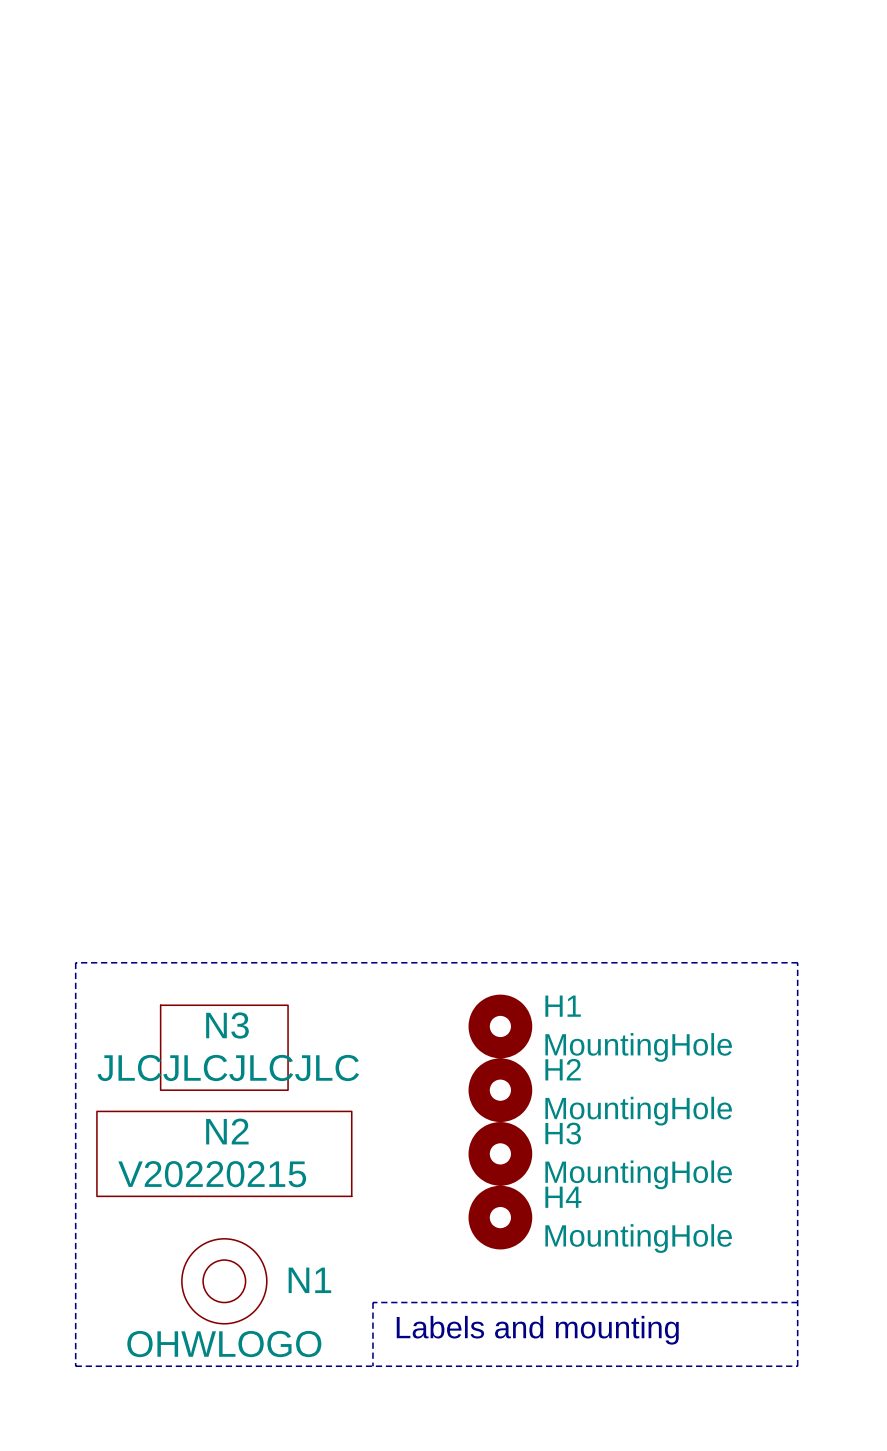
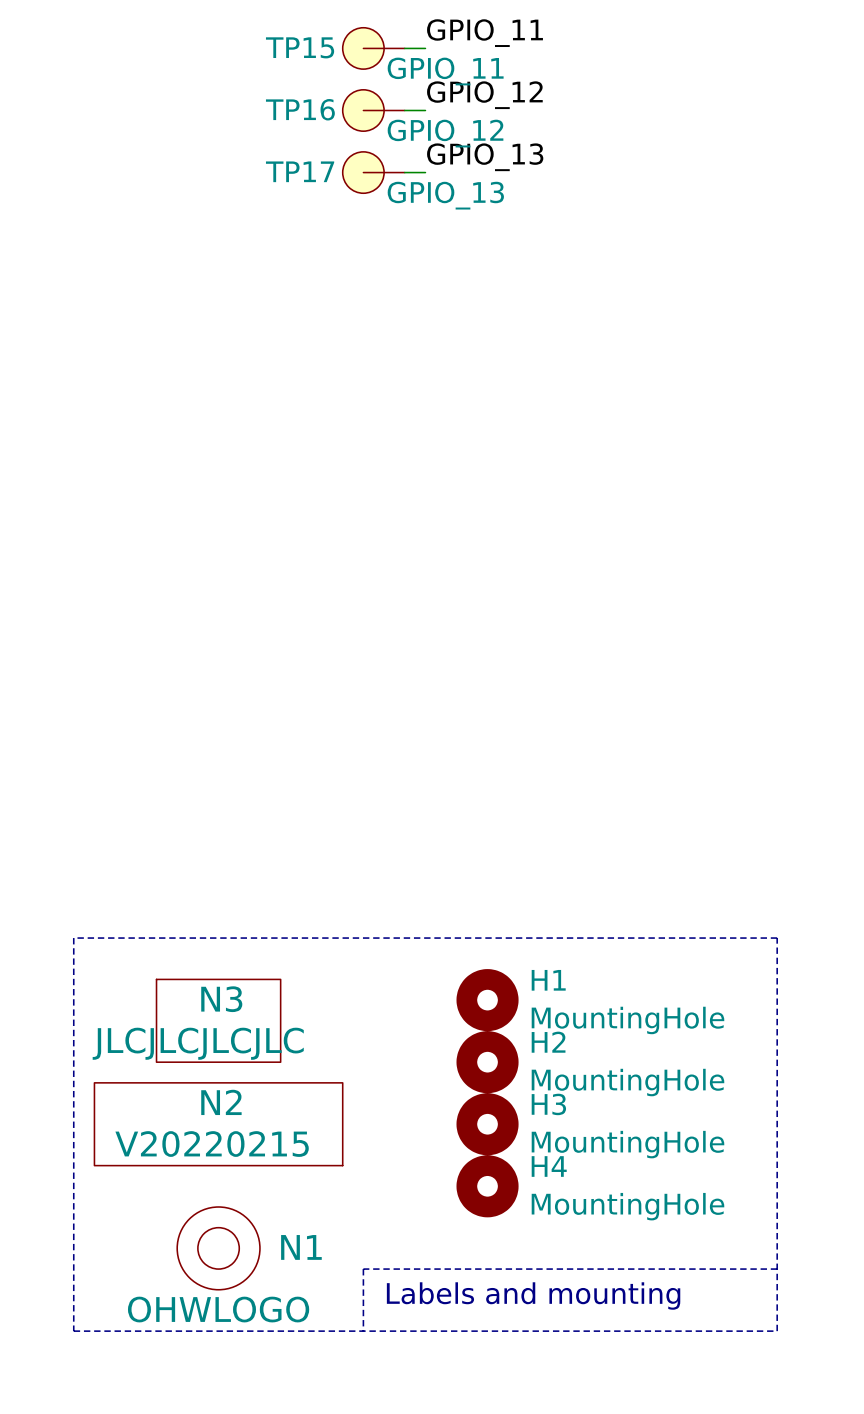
label: none -> GPIO_11 (485, 33)
TP15: none -> GPIO_11 (373, 48)
wire: none -> (404, 48) (425, 48)
label: none -> GPIO_12 (484, 95)
TP16: none -> GPIO_12 (373, 110)
wire: none -> (404, 110) (425, 110)
label: none -> GPIO_13 (485, 157)
TP17: none -> GPIO_13 (373, 172)
wire: none -> (404, 172) (425, 172)

